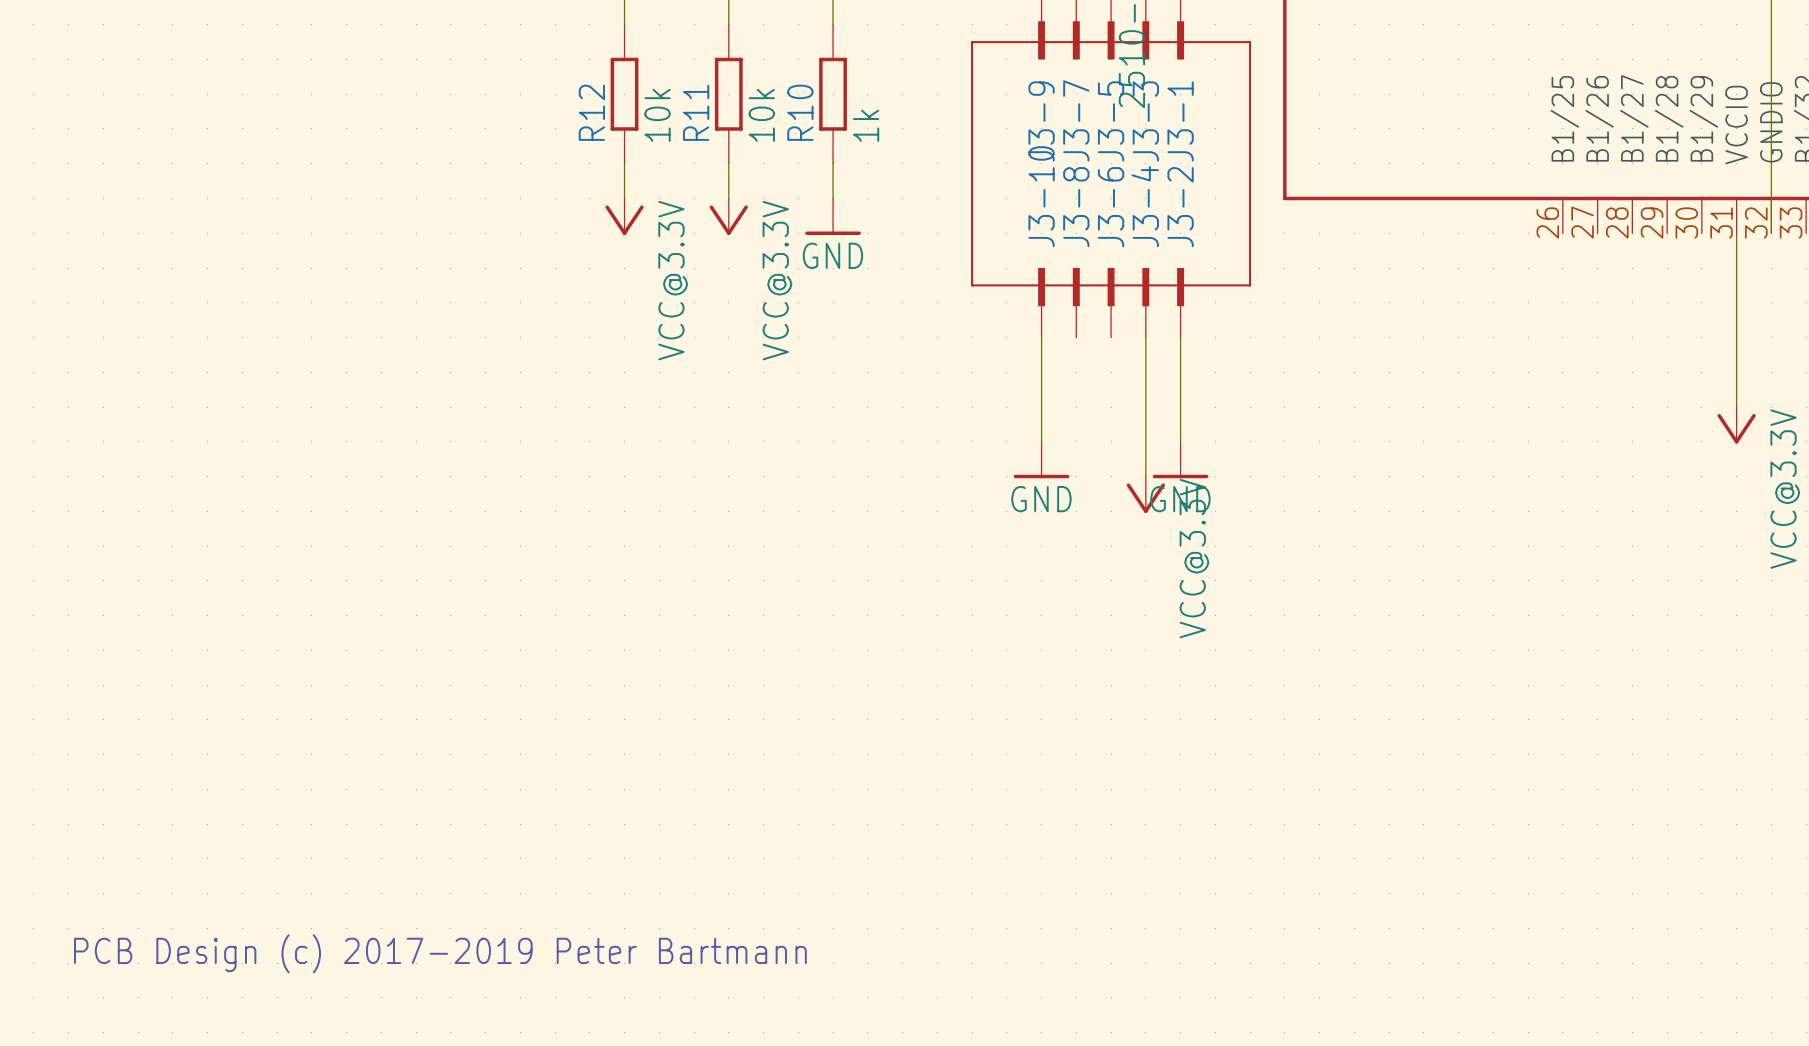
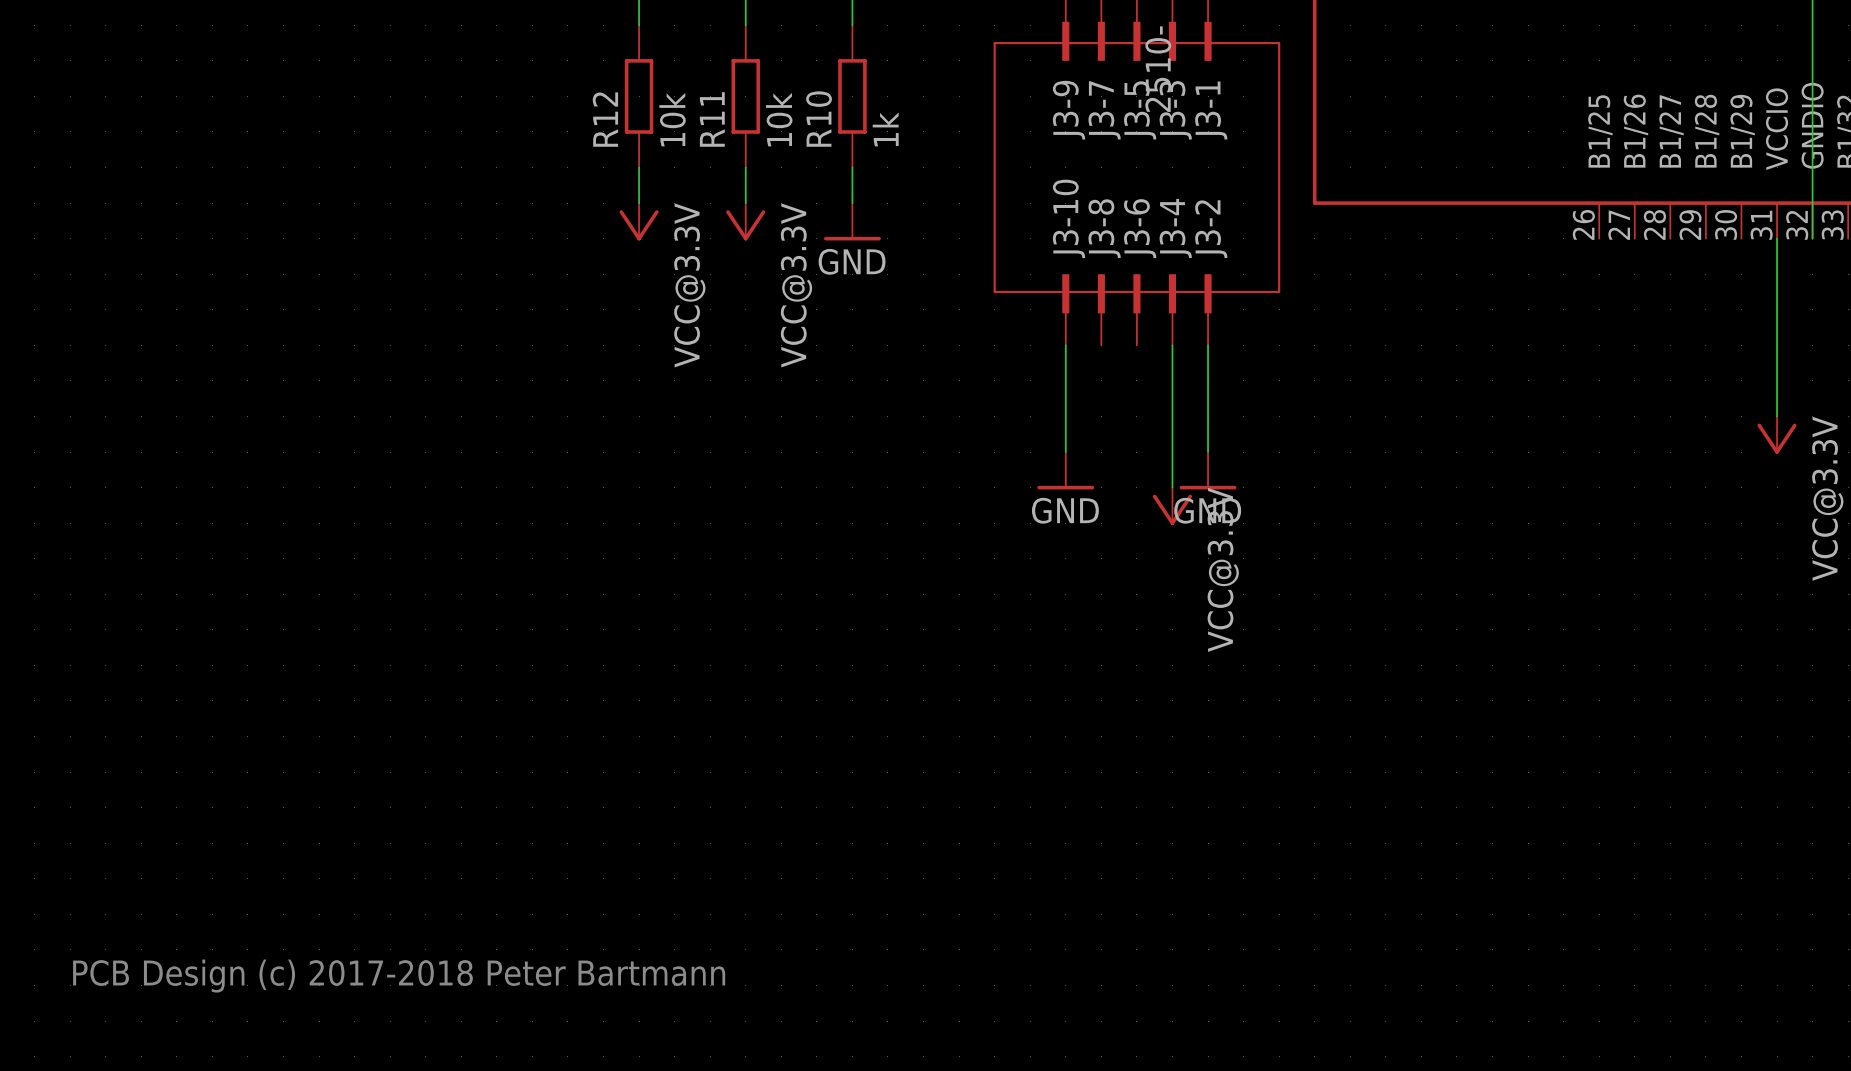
text: PCB Design (c) 2017-2019 Peter Bartmann (440, 953) -> PCB Design (c) 2017-2018 Peter Bartmann (399, 976)

